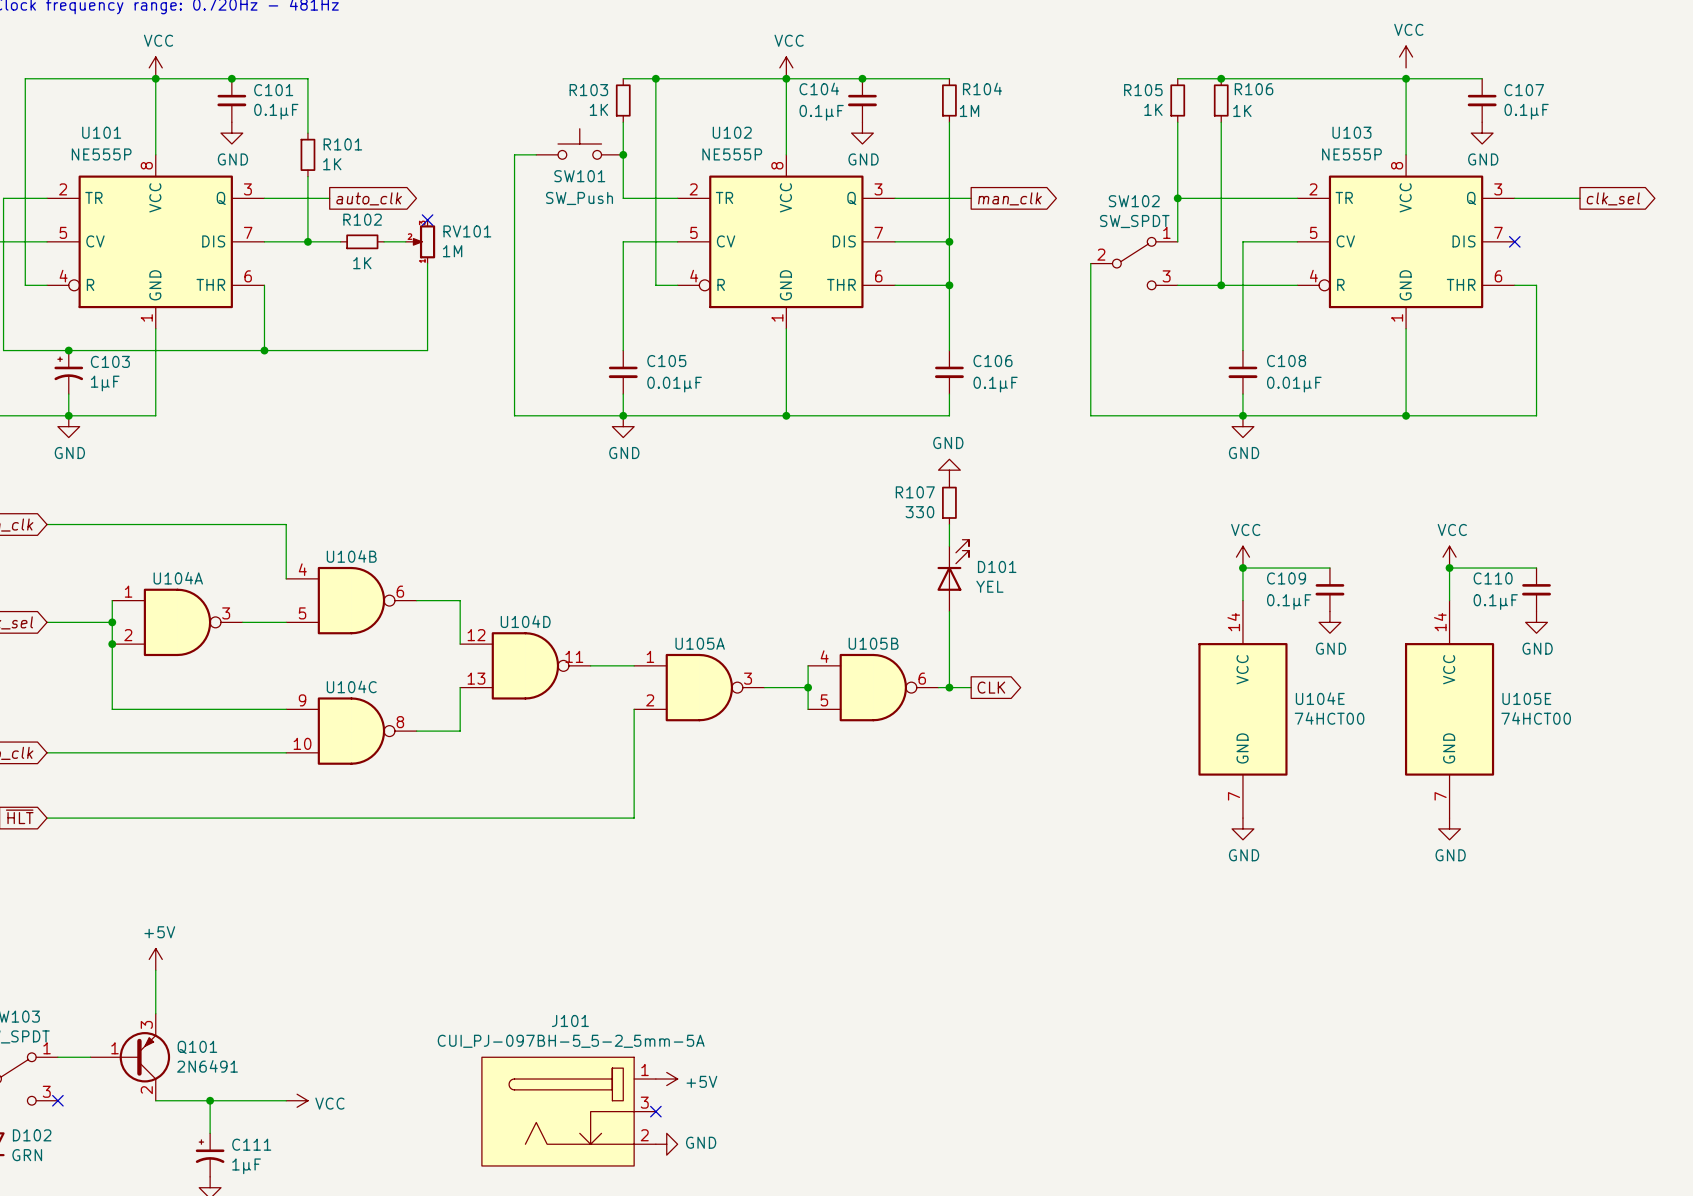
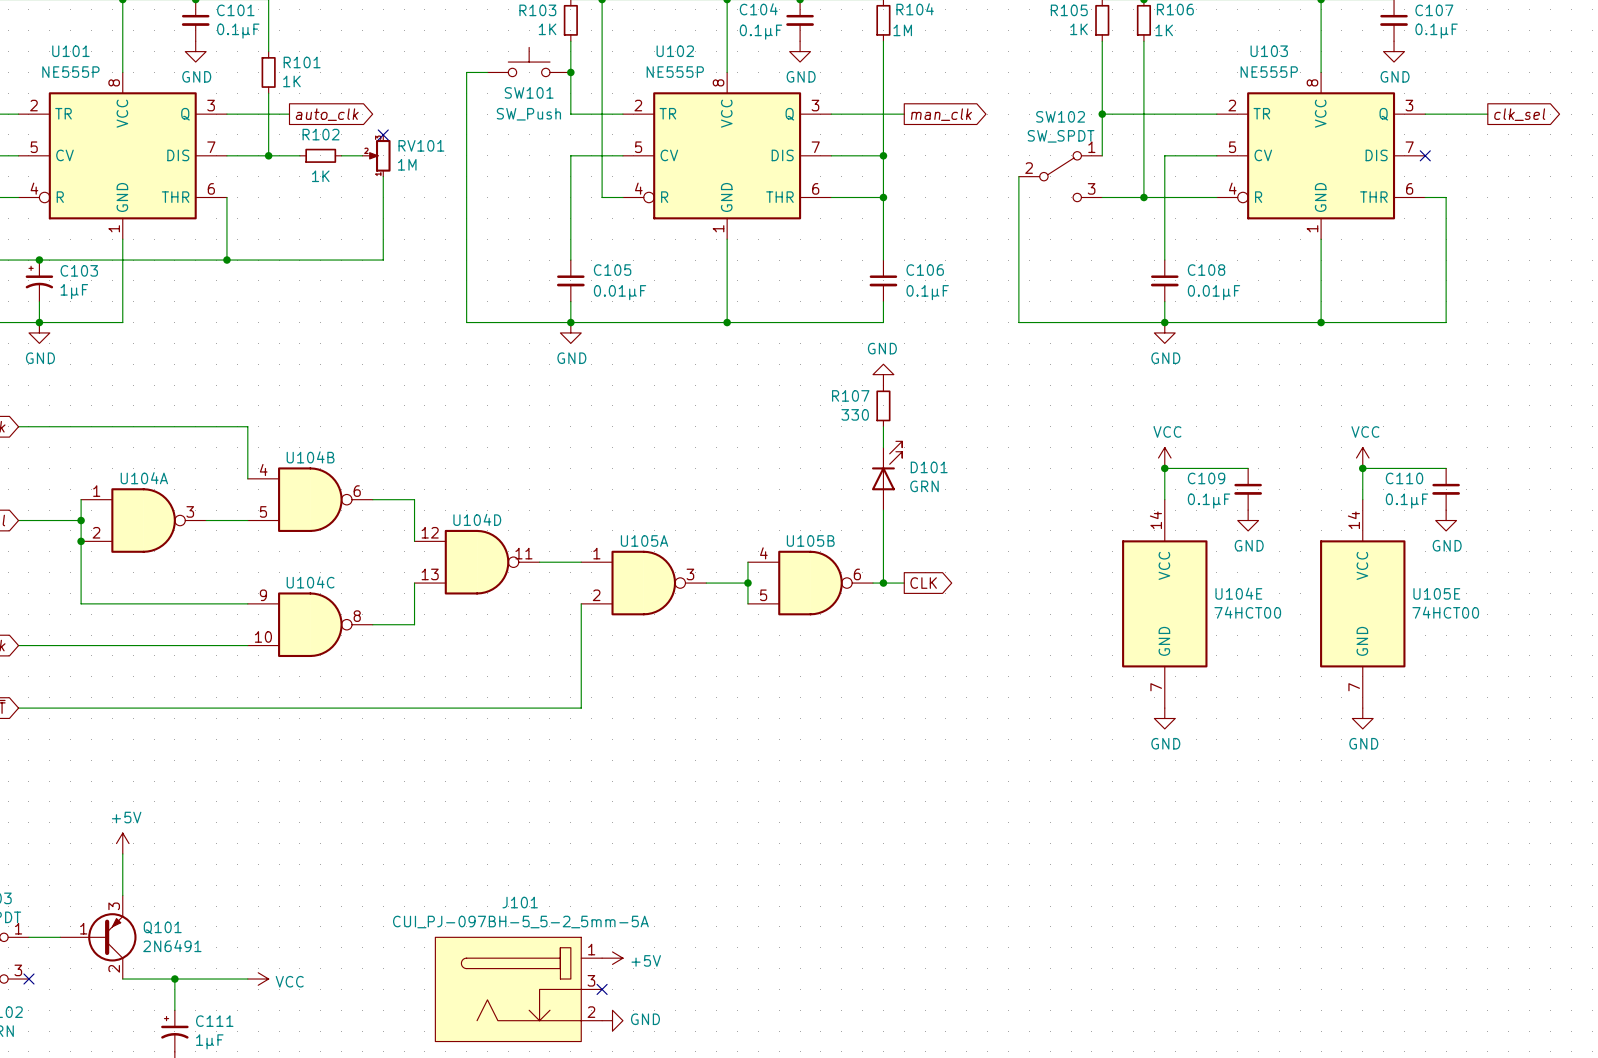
D101 value: YEL (989, 586) -> GRN (924, 486)

